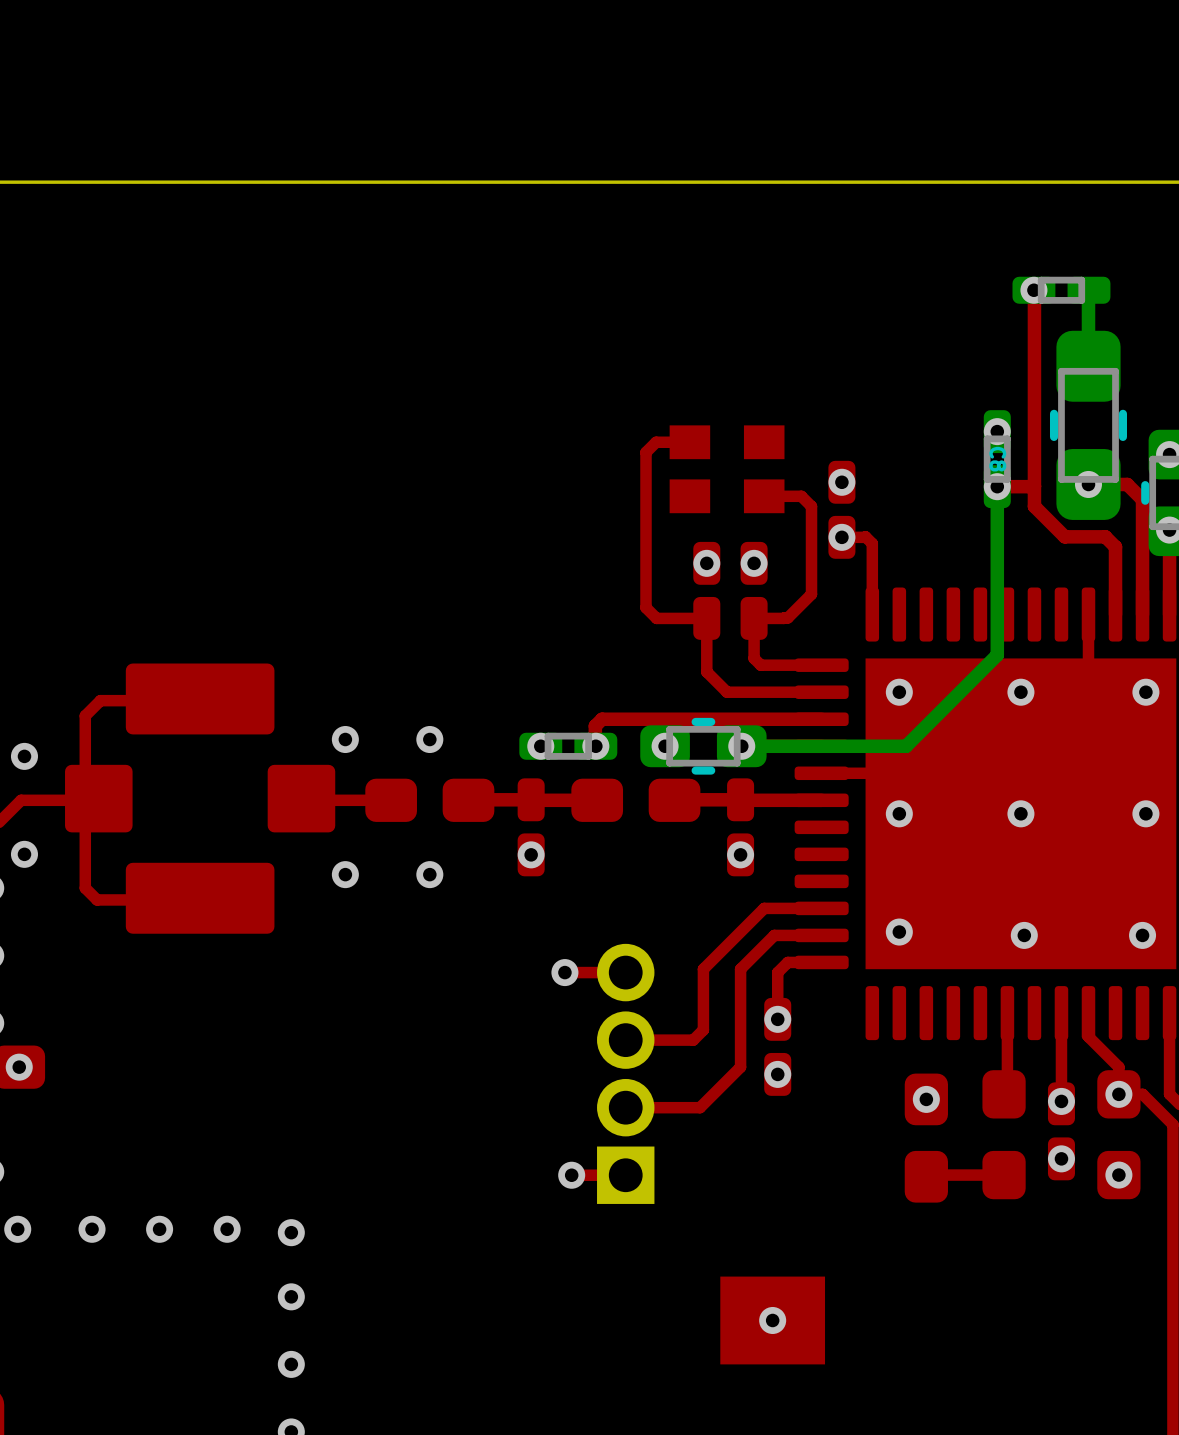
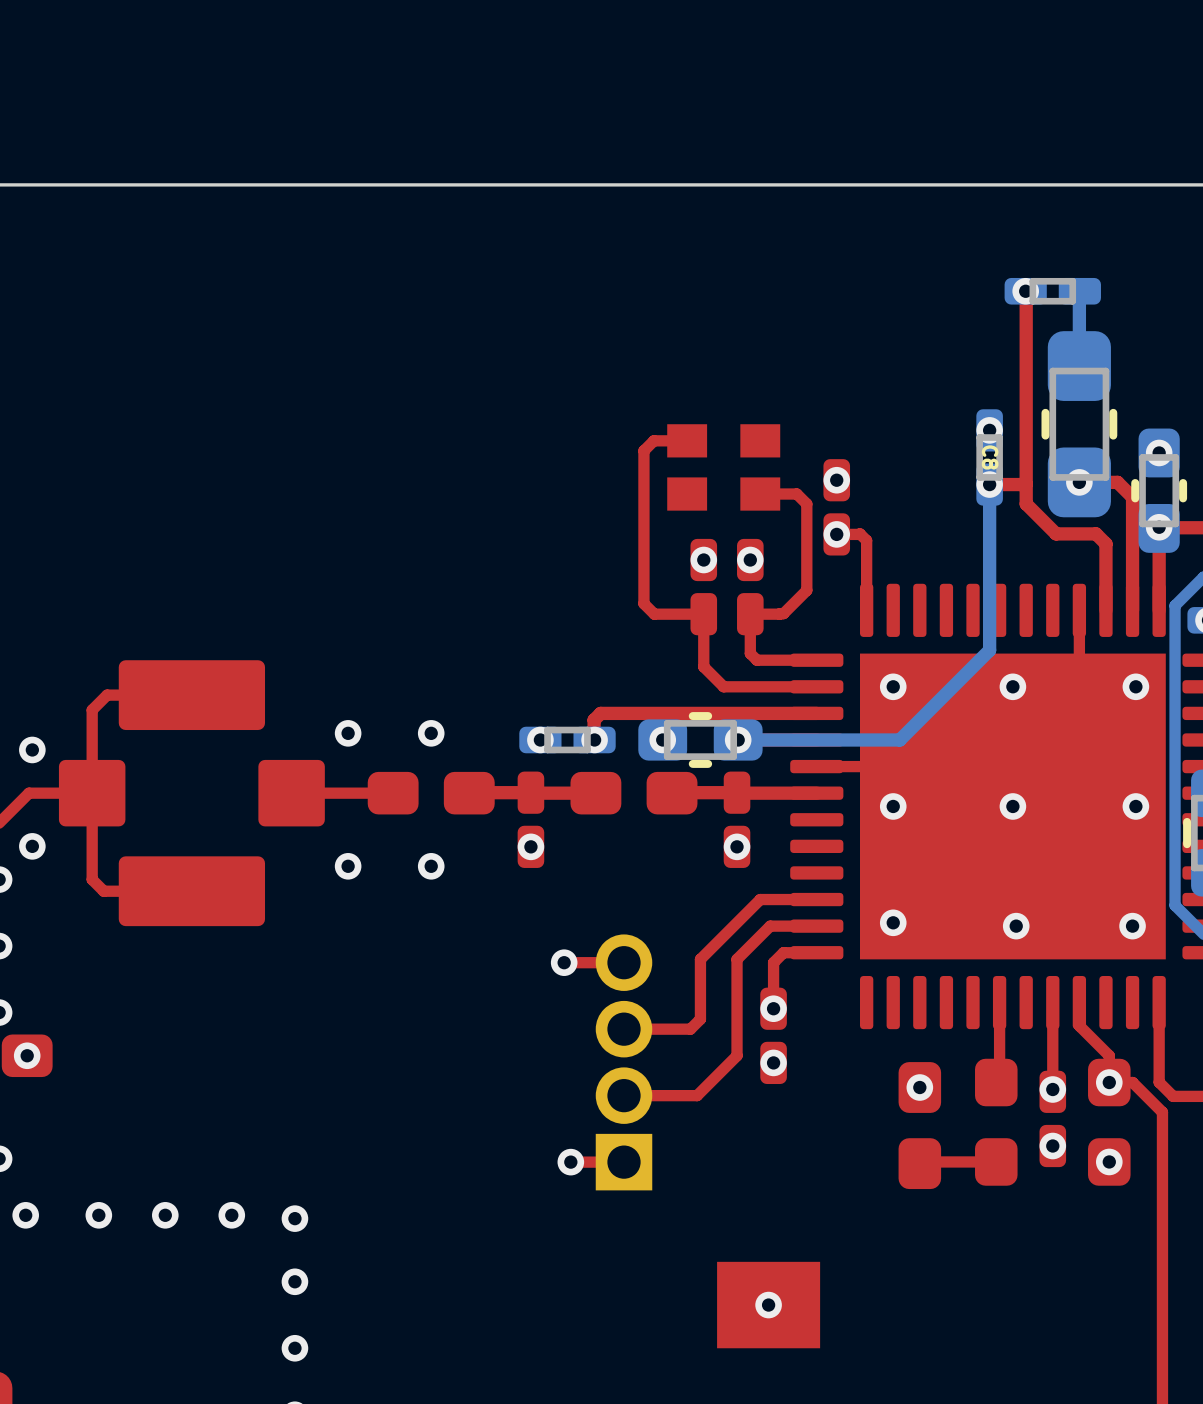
part position: (200, 798) -> (191, 793)

